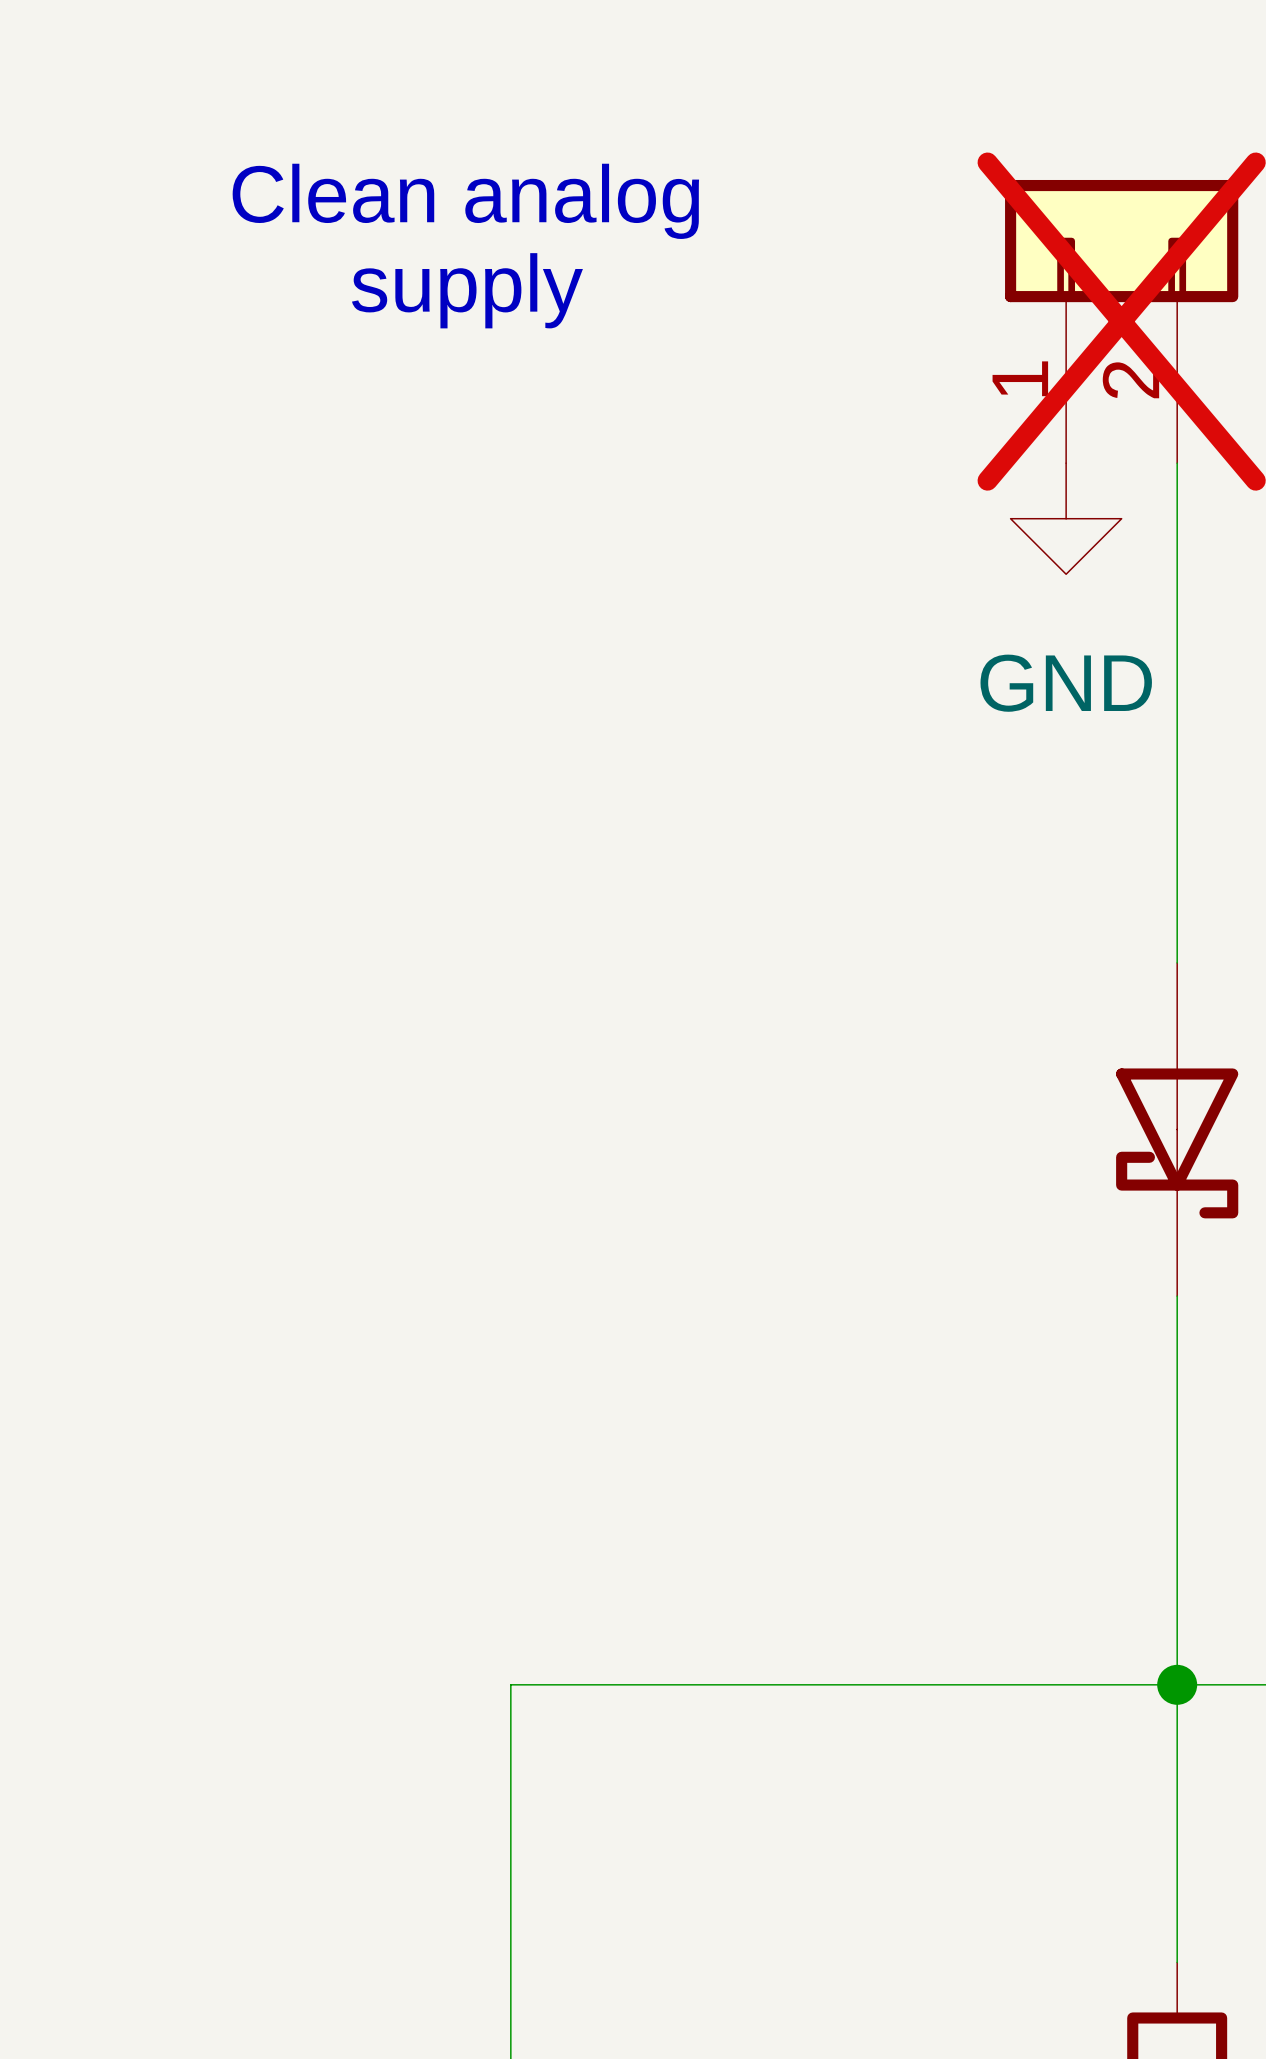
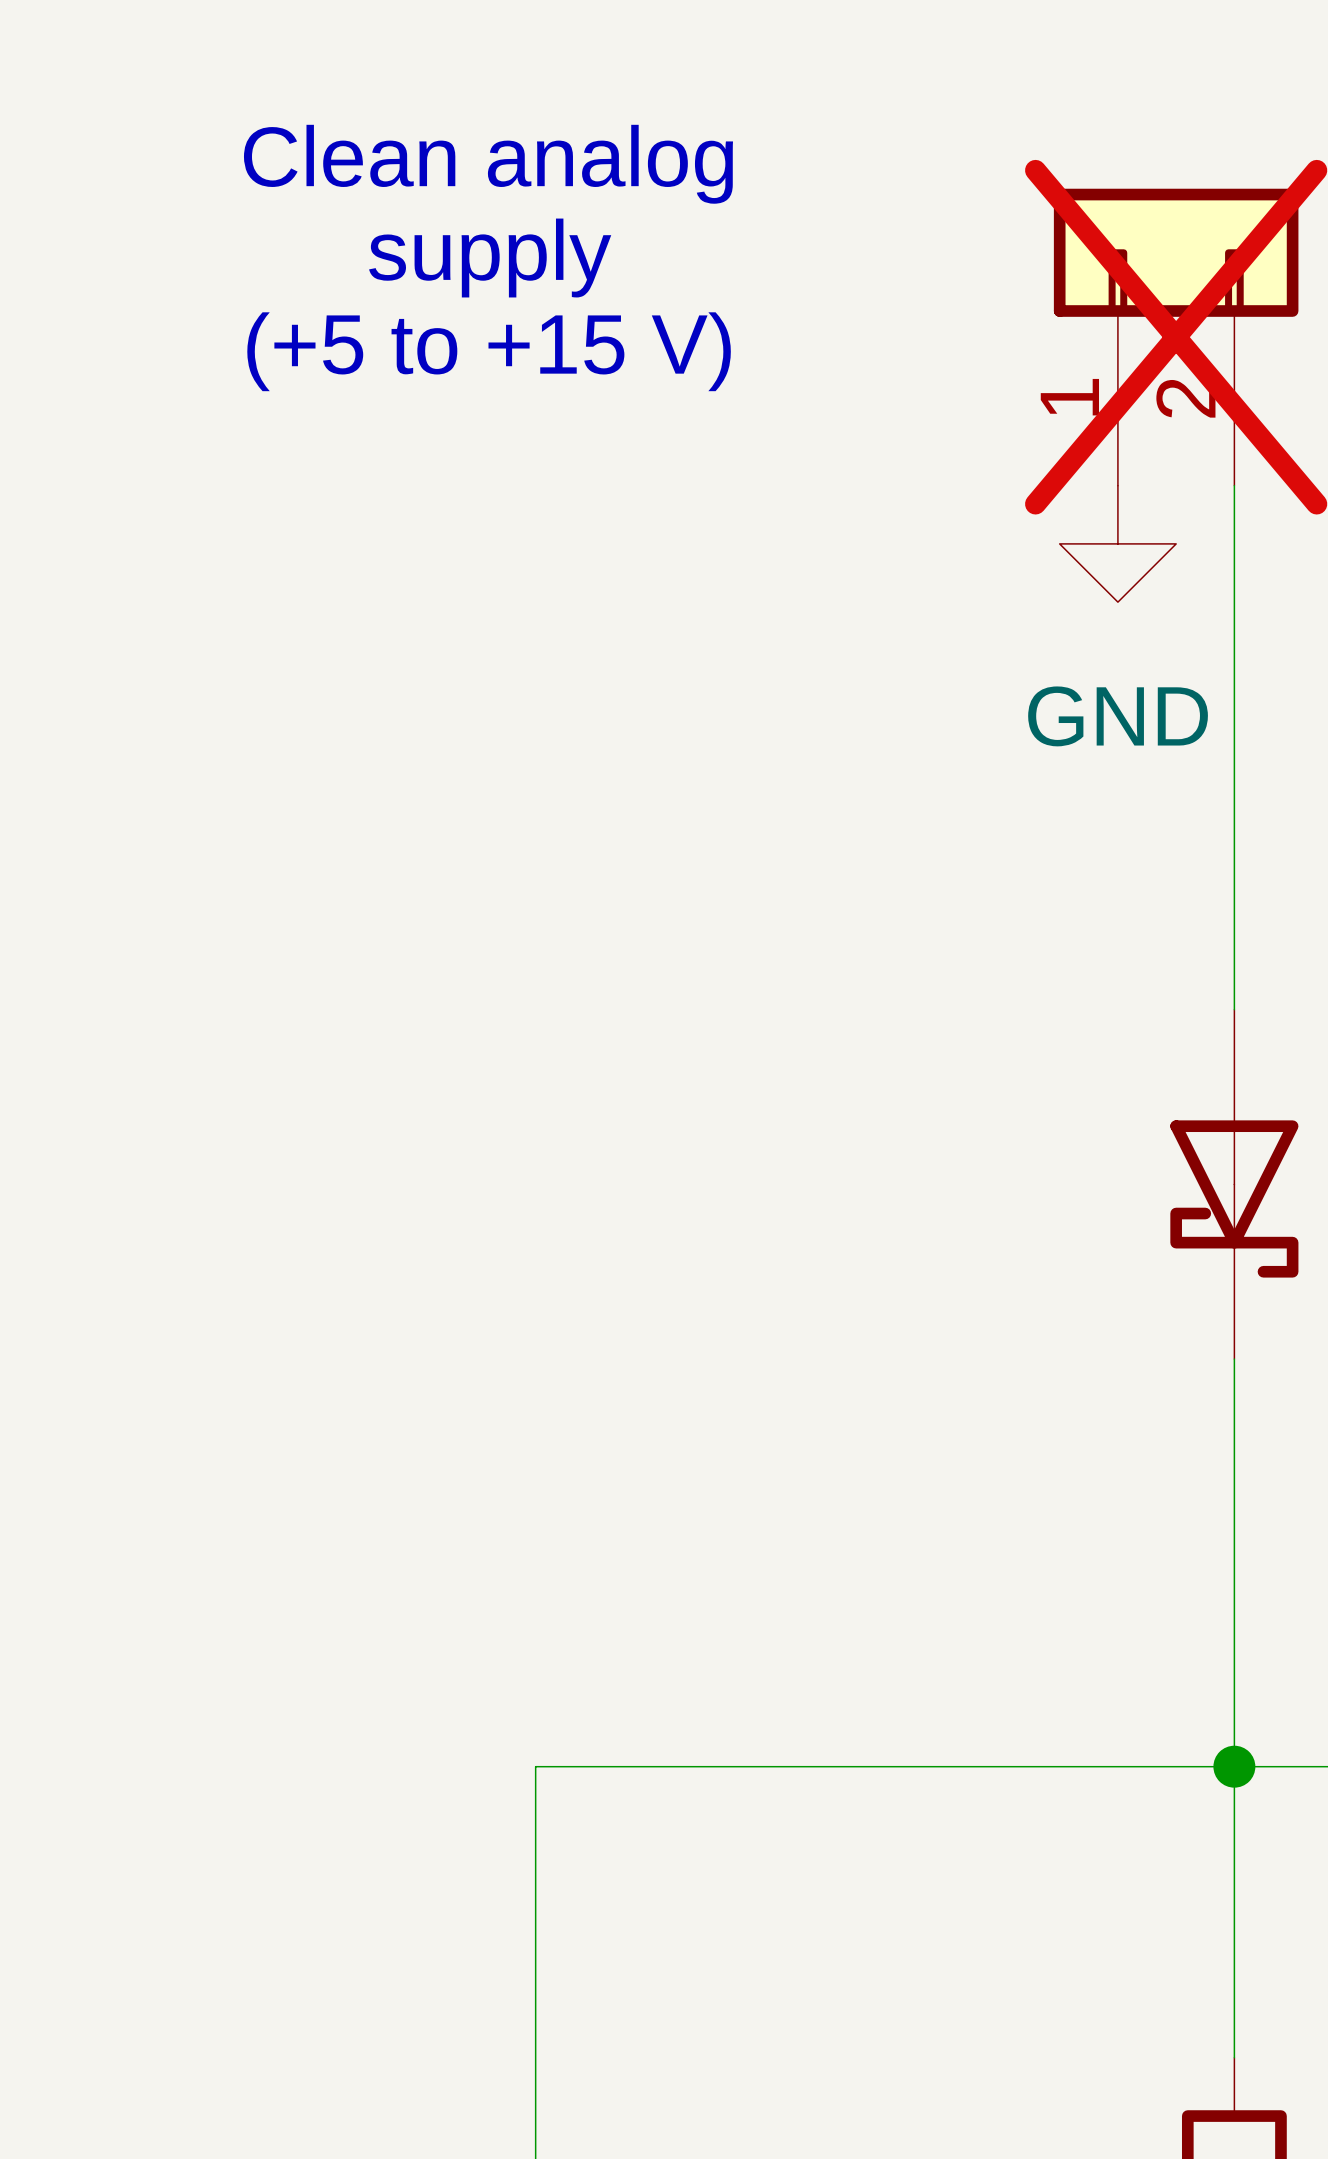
text position: Clean analog (465, 201) -> Clean analog (488, 164)
text position: supply (467, 290) -> supply (490, 258)
text: none -> (+5 to +15 V) (489, 351)

